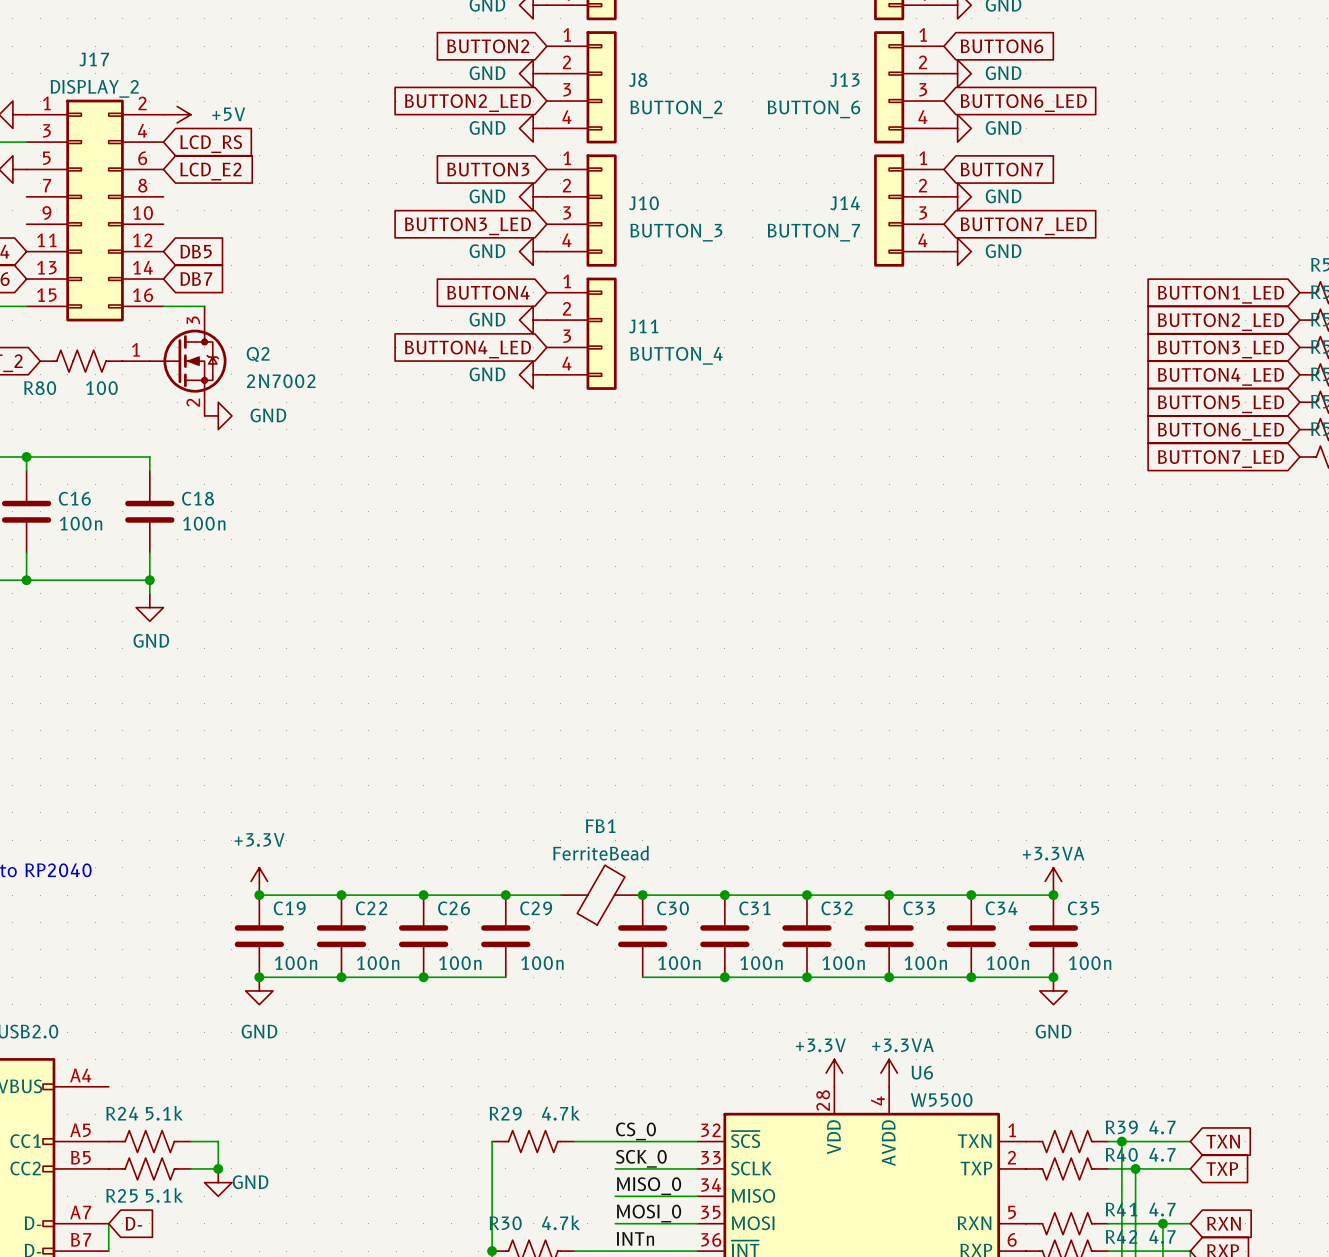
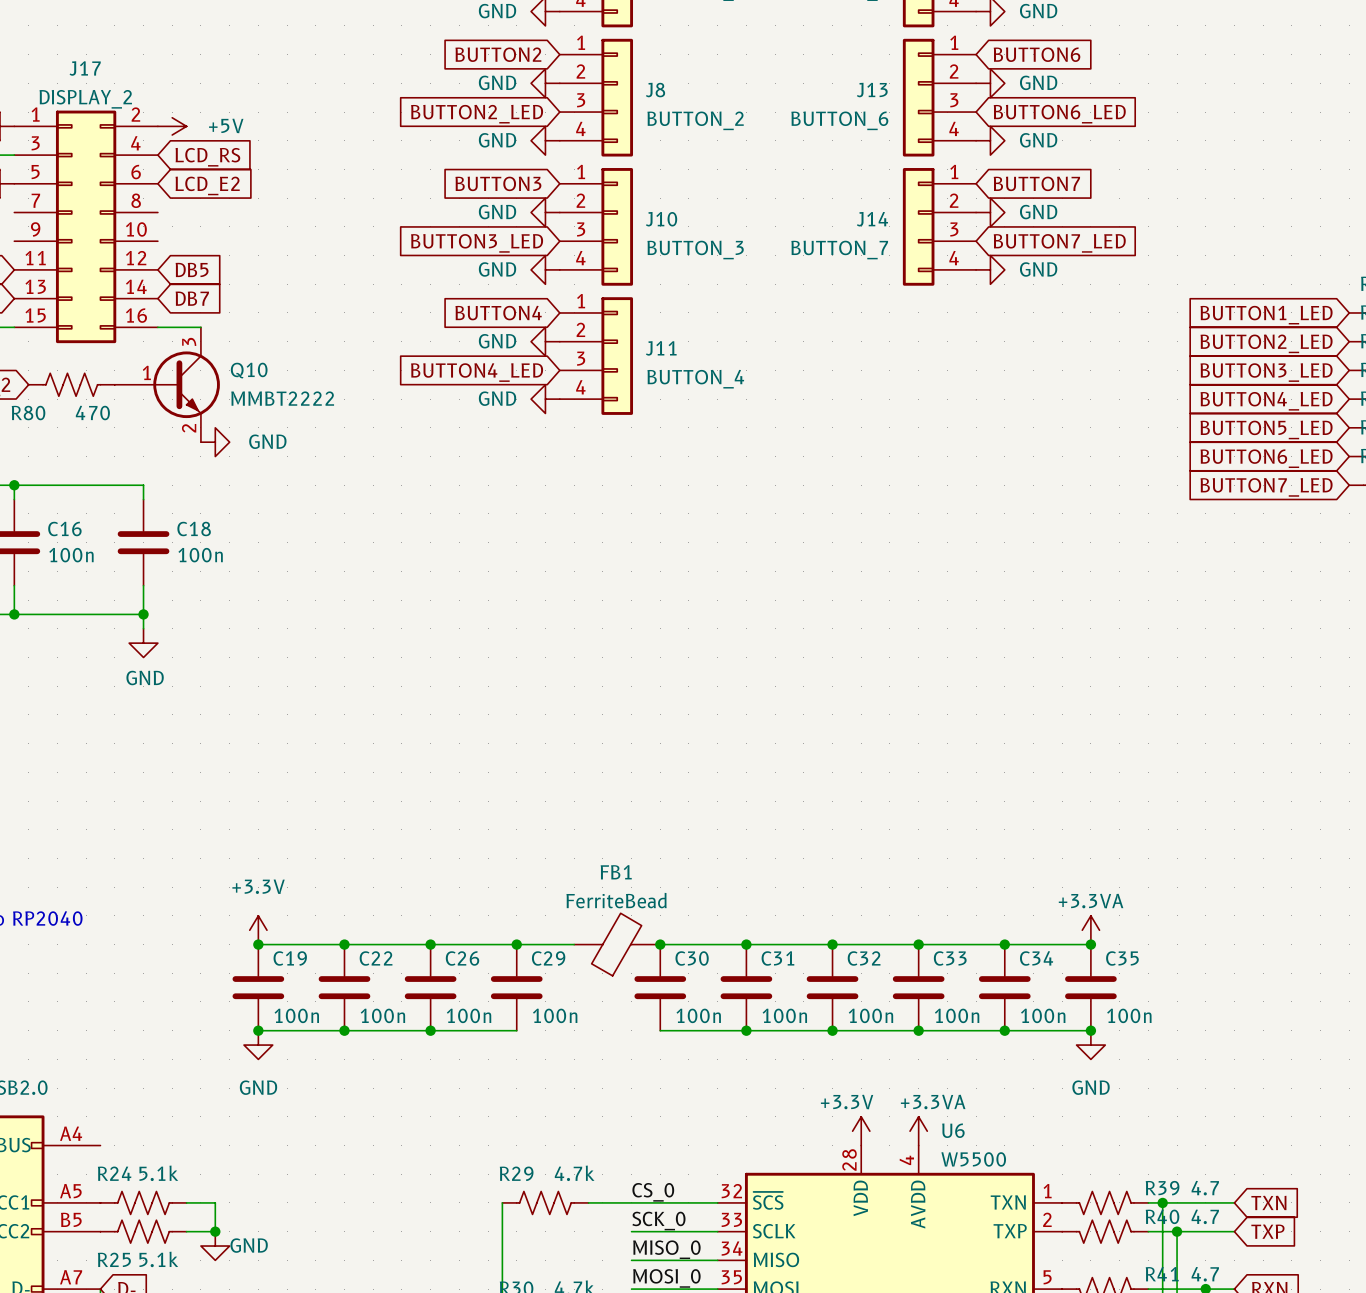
Q10: none -> MMBT2222 (167, 384)
Q2: 2N7002 (174, 361) -> none
R80 value: 100 (101, 388) -> 470 (92, 413)

